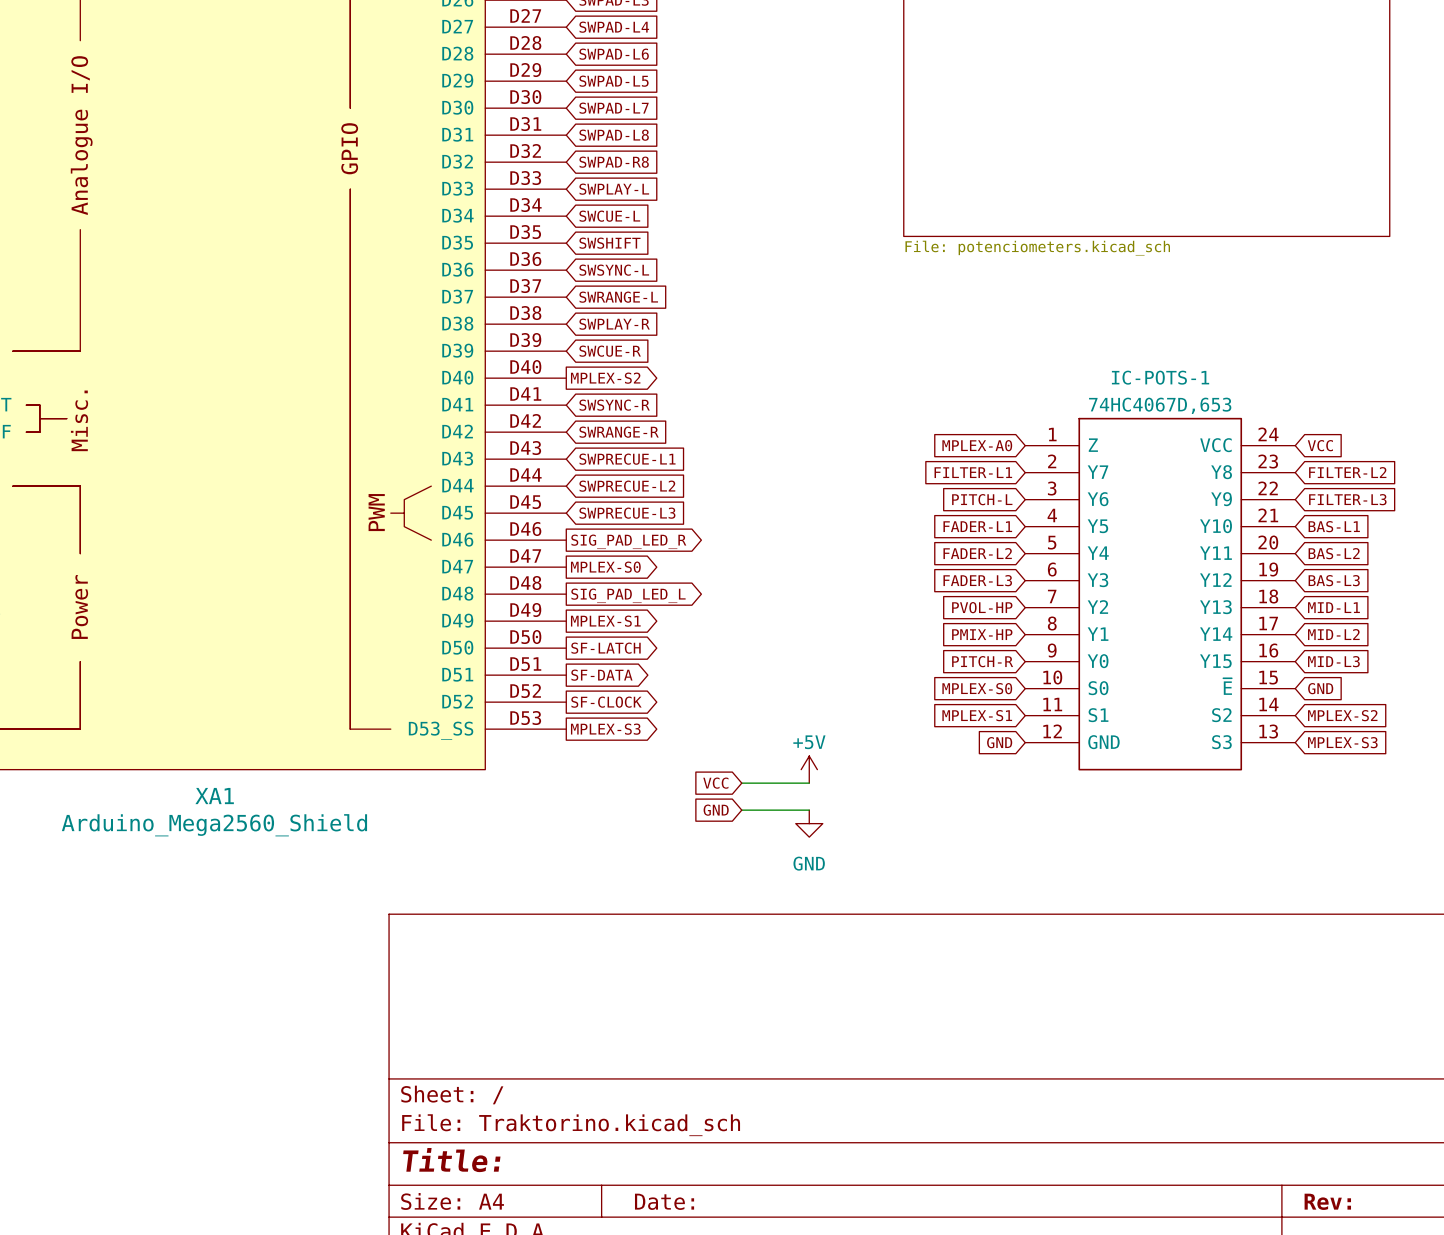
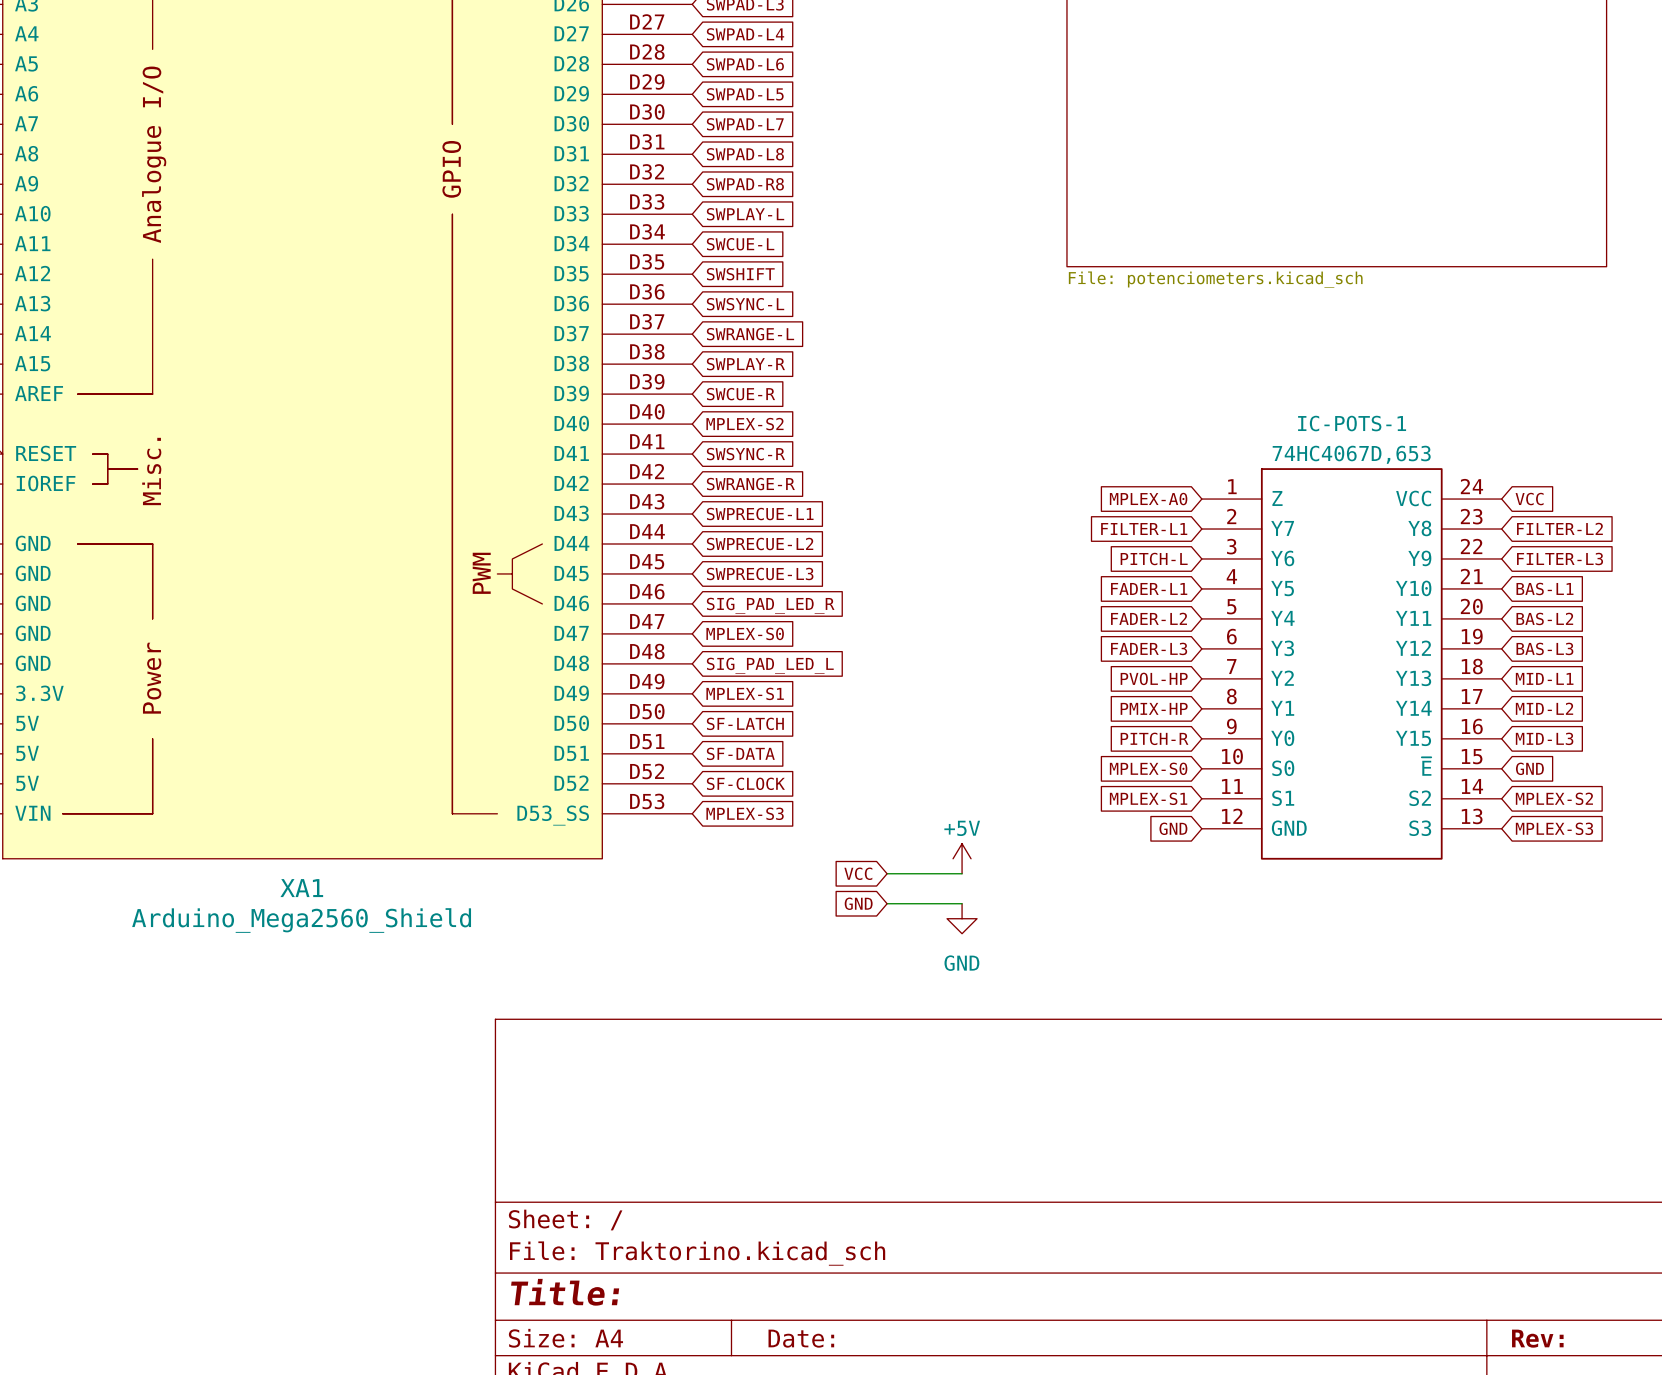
global label shape: output (605, 378) -> input (744, 424)
global label shape: output (628, 541) -> input (770, 605)
global label shape: output (605, 567) -> input (745, 633)
global label shape: output (628, 595) -> input (770, 665)
global label shape: output (605, 621) -> input (745, 693)
global label shape: output (606, 648) -> input (745, 723)
global label shape: output (601, 675) -> input (740, 753)
global label shape: output (606, 702) -> input (745, 783)
global label shape: output (605, 729) -> input (745, 813)

